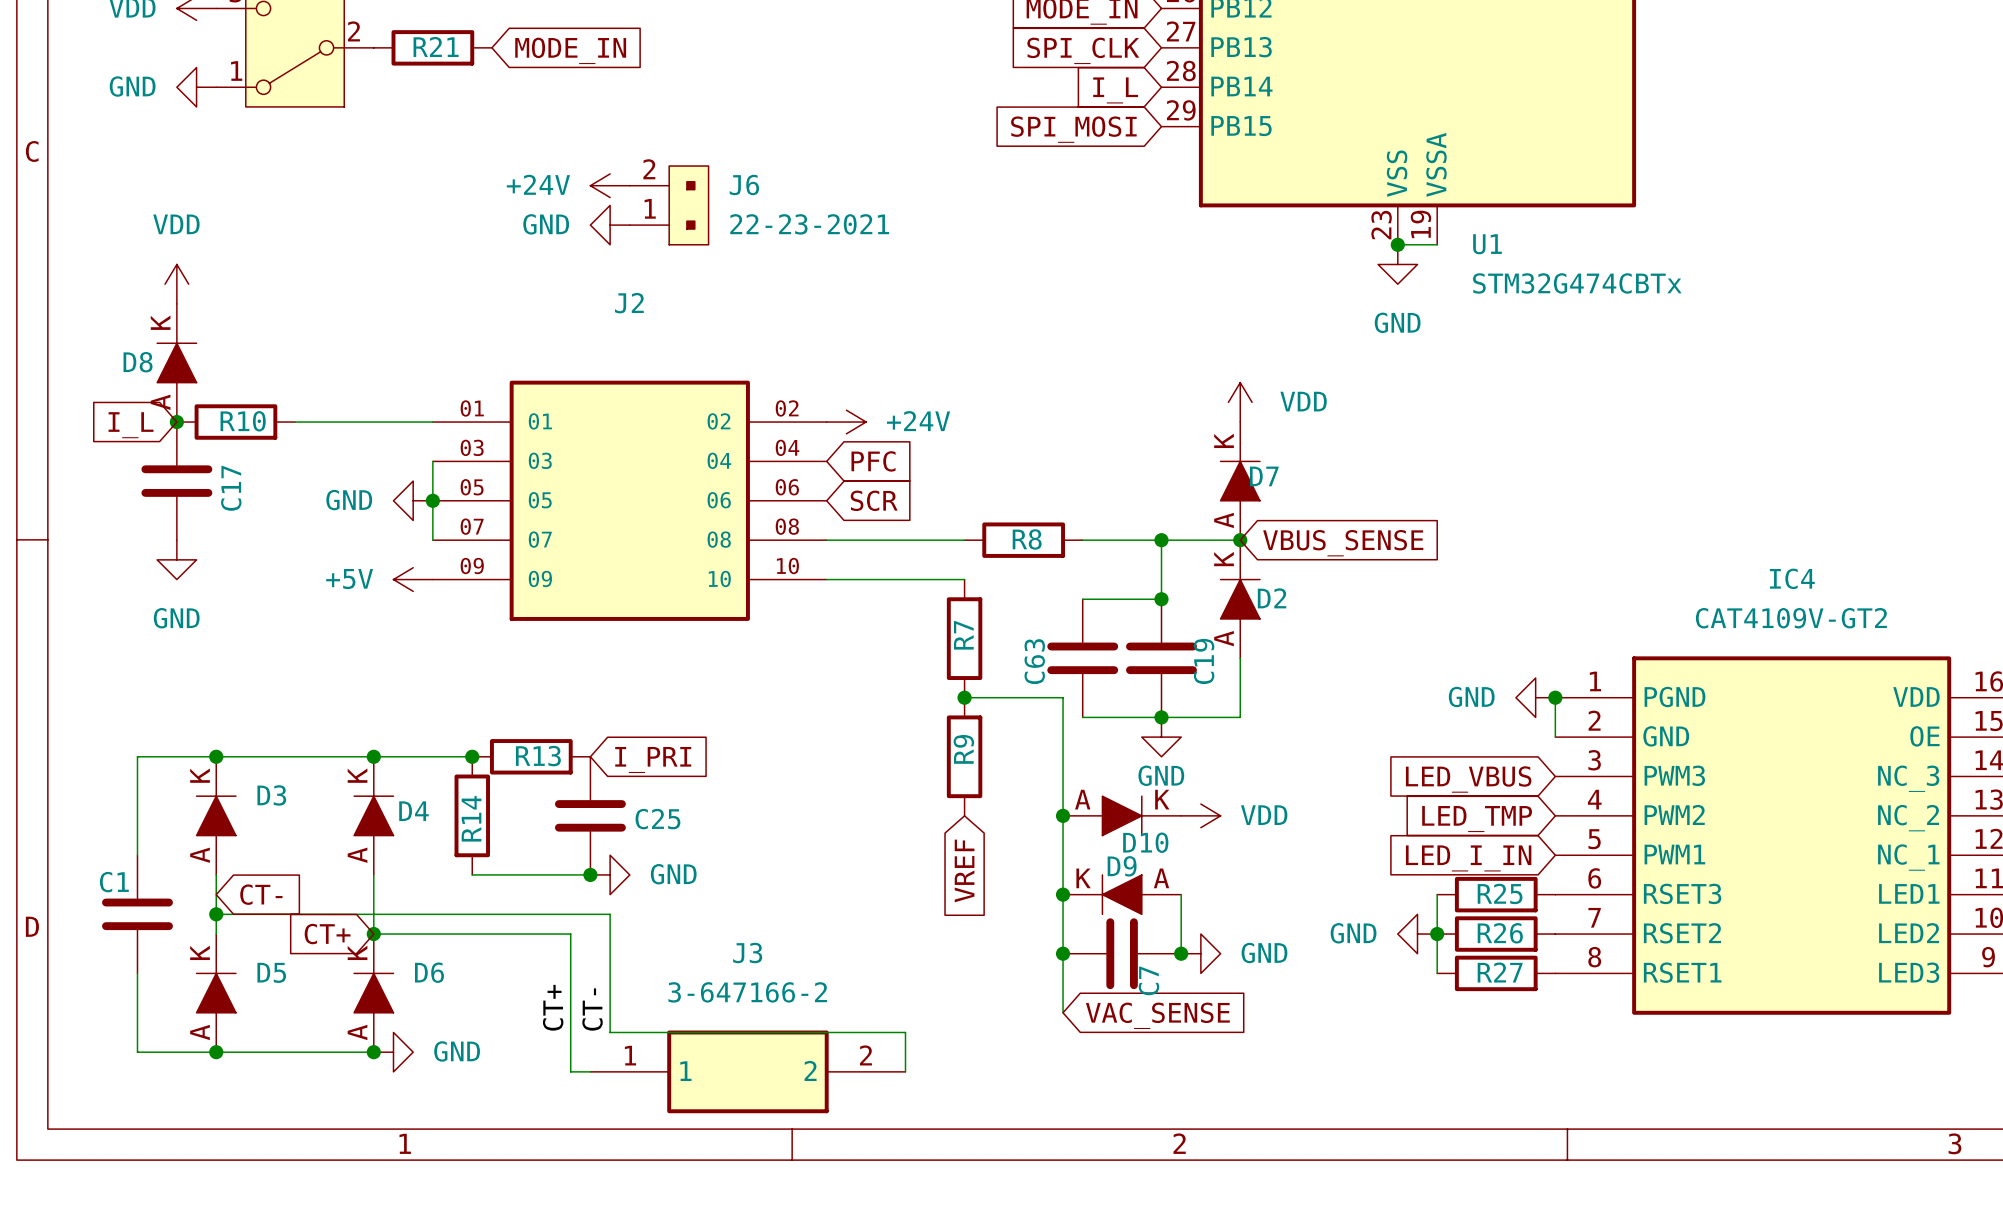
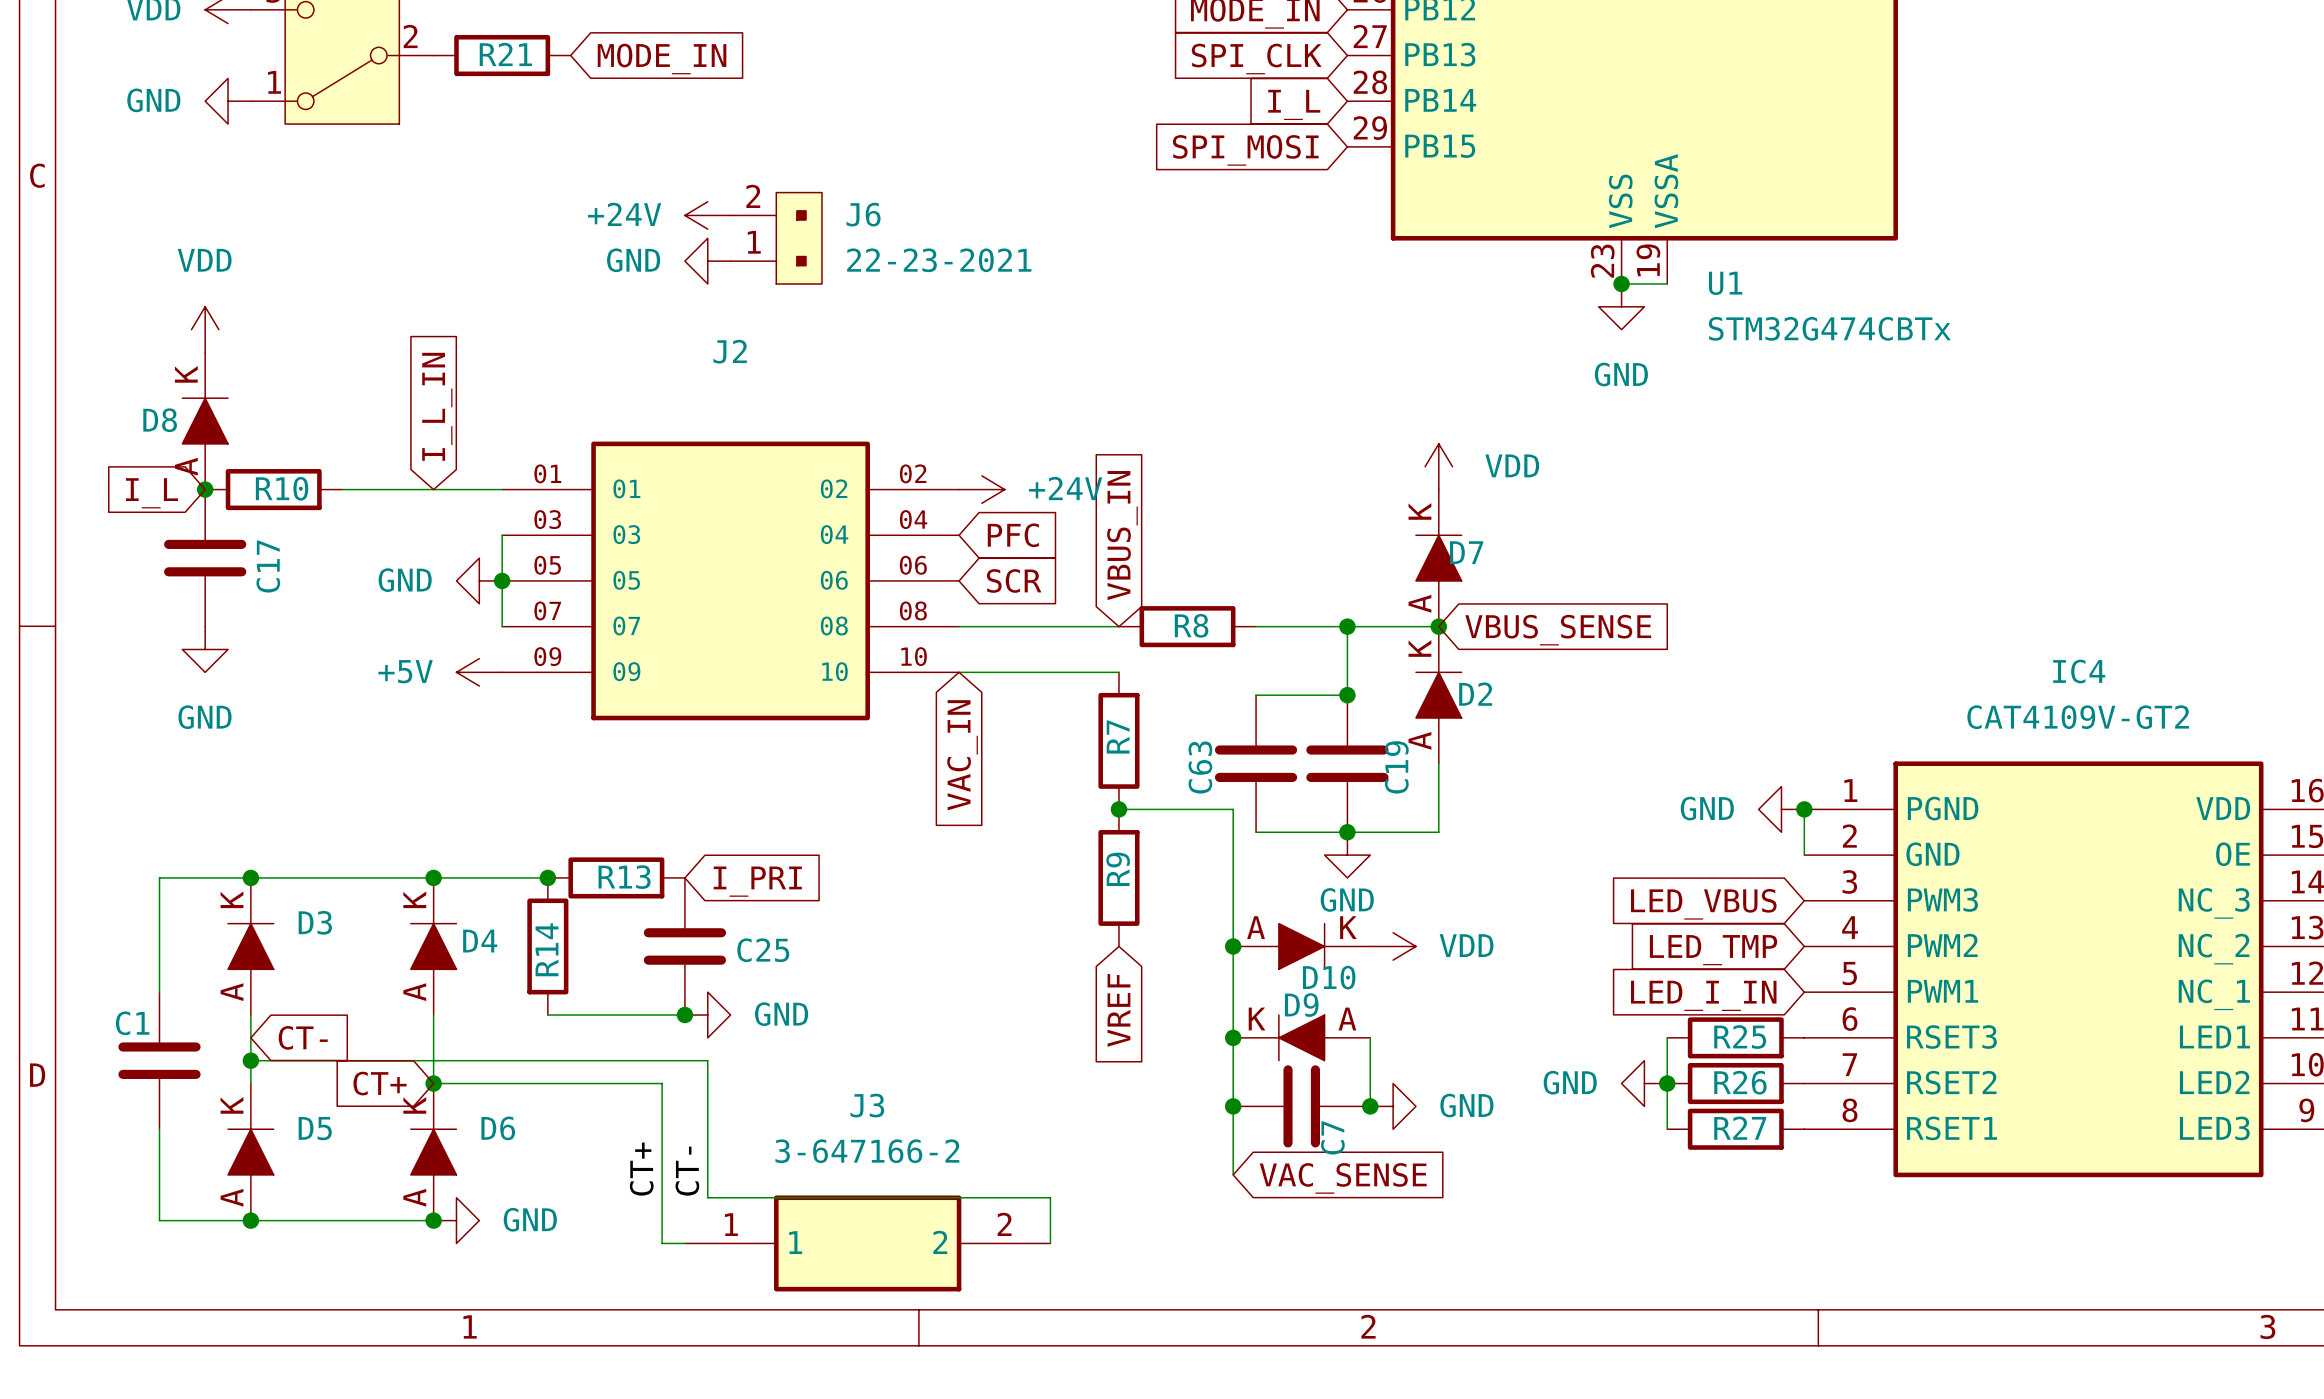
global label: none -> I_L_IN (437, 406)
global label: none -> VBUS_IN (1122, 535)
global label: none -> VAC_IN (962, 755)

